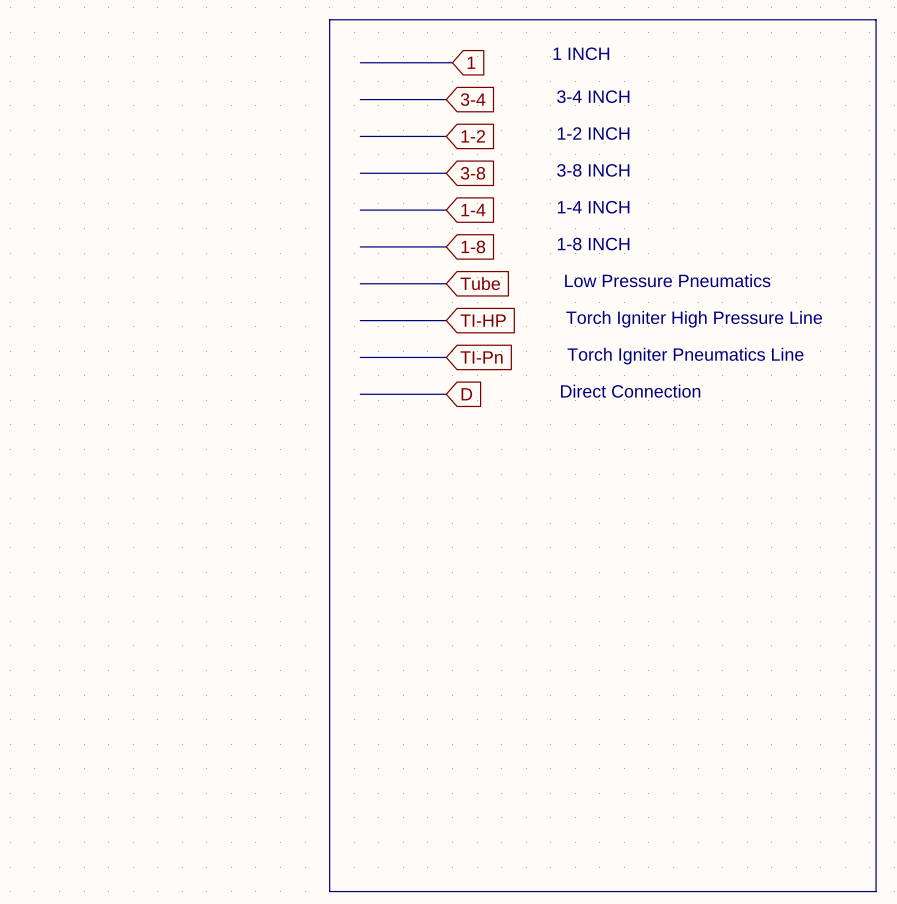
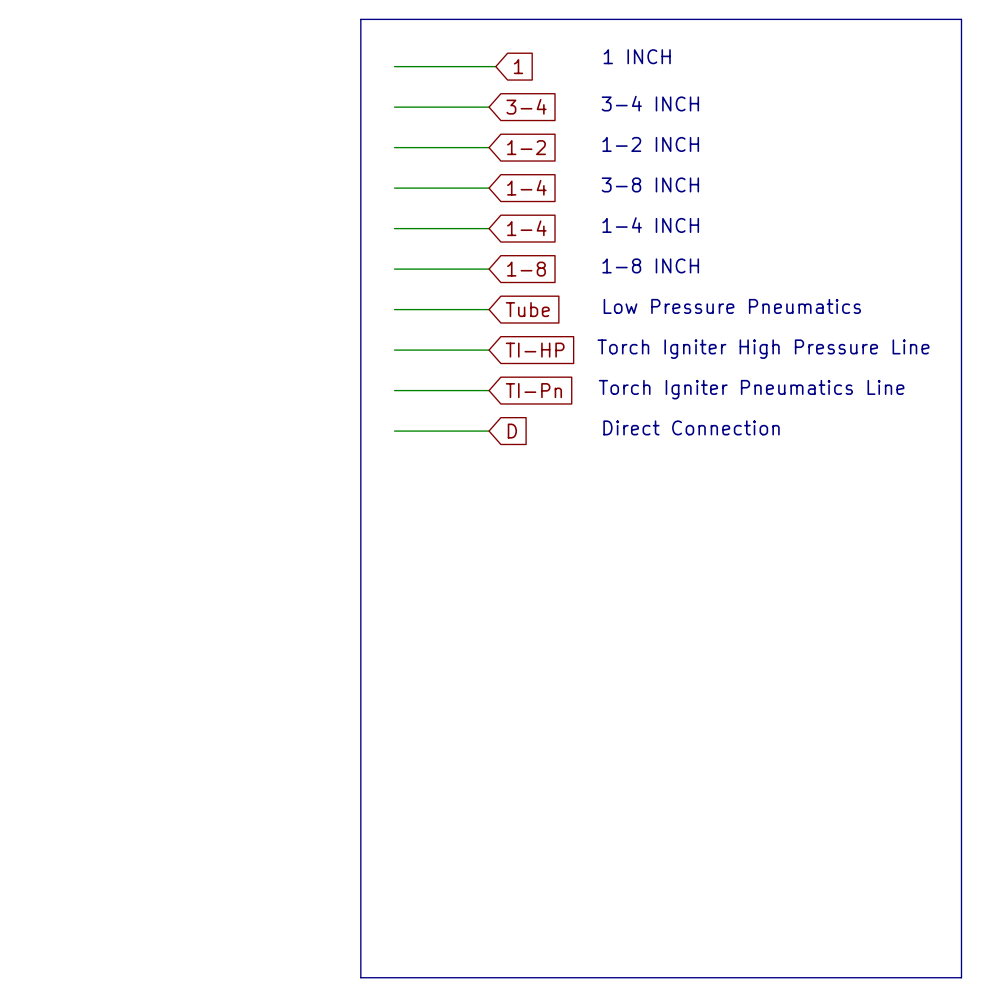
global label: 3-8 (472, 173) -> 1-4 (526, 187)

